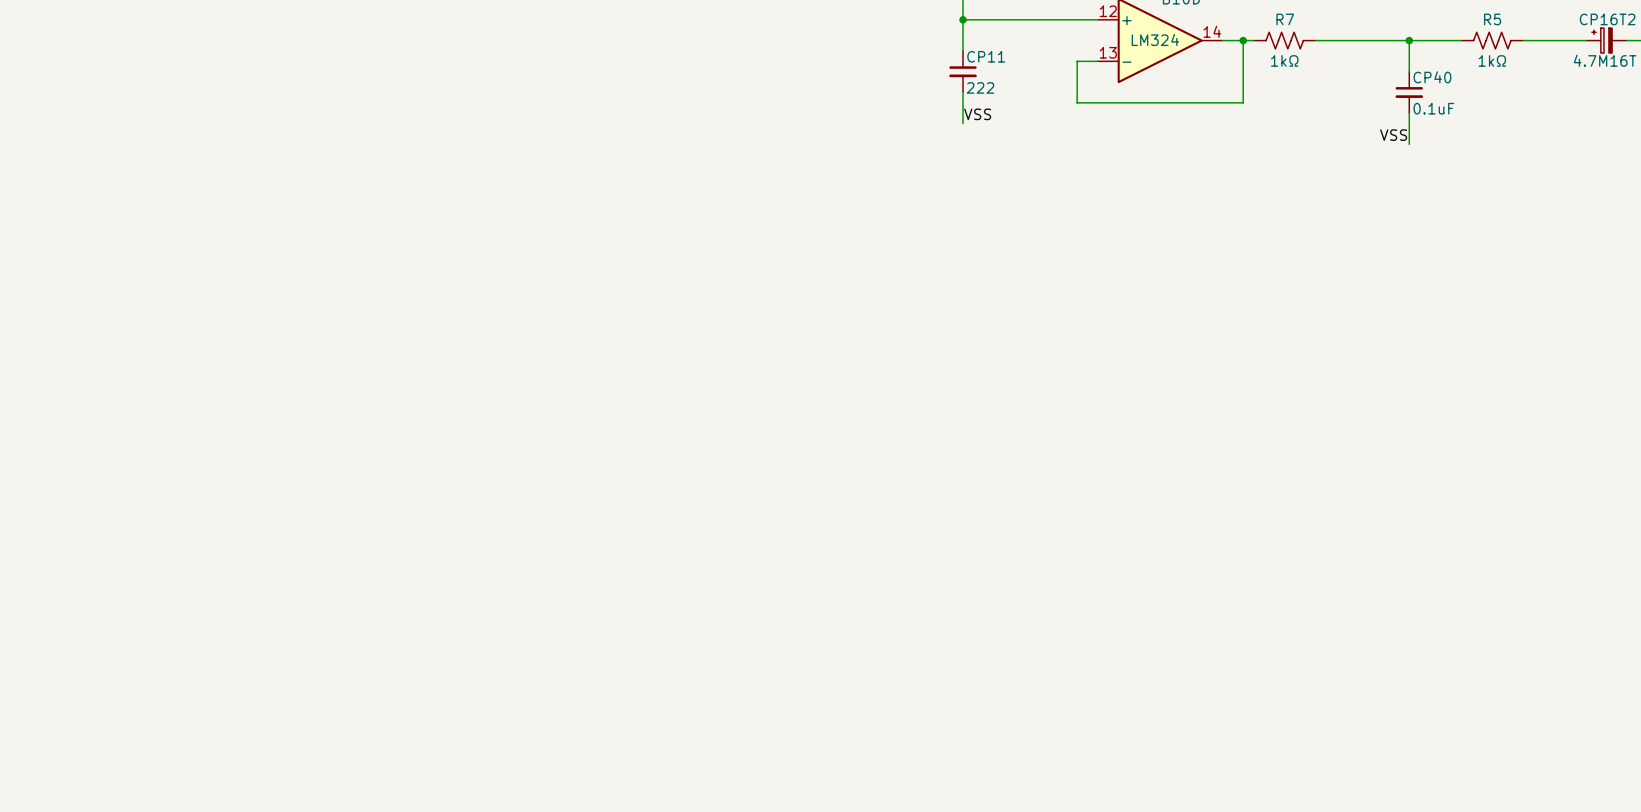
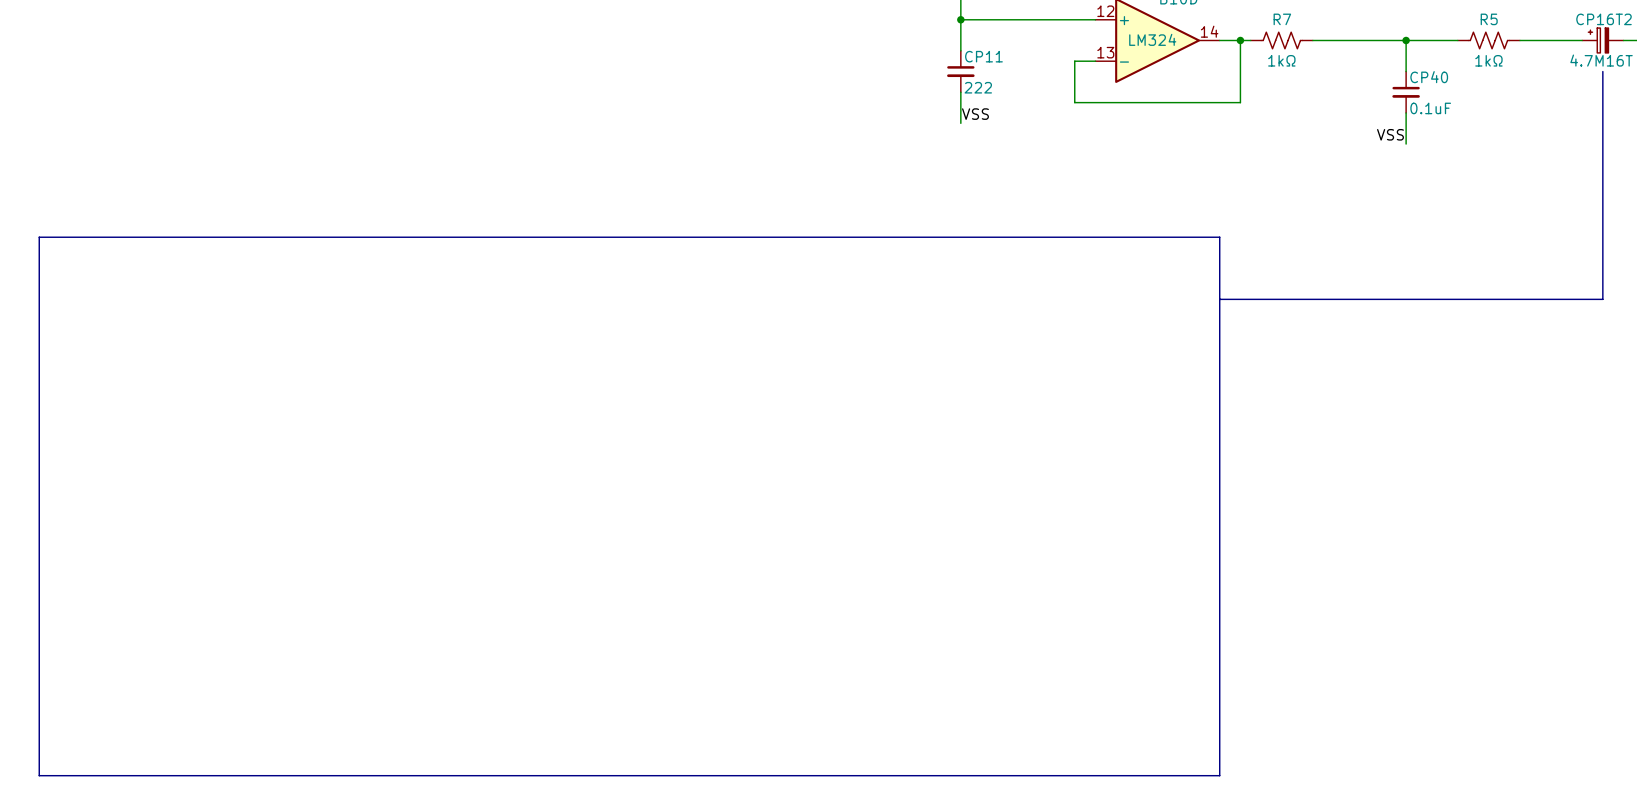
line: none -> (1602, 71) (1602, 299) (1219, 299)
line: none -> (39, 237) (1219, 237) (1219, 775) (39, 775) (39, 237)

